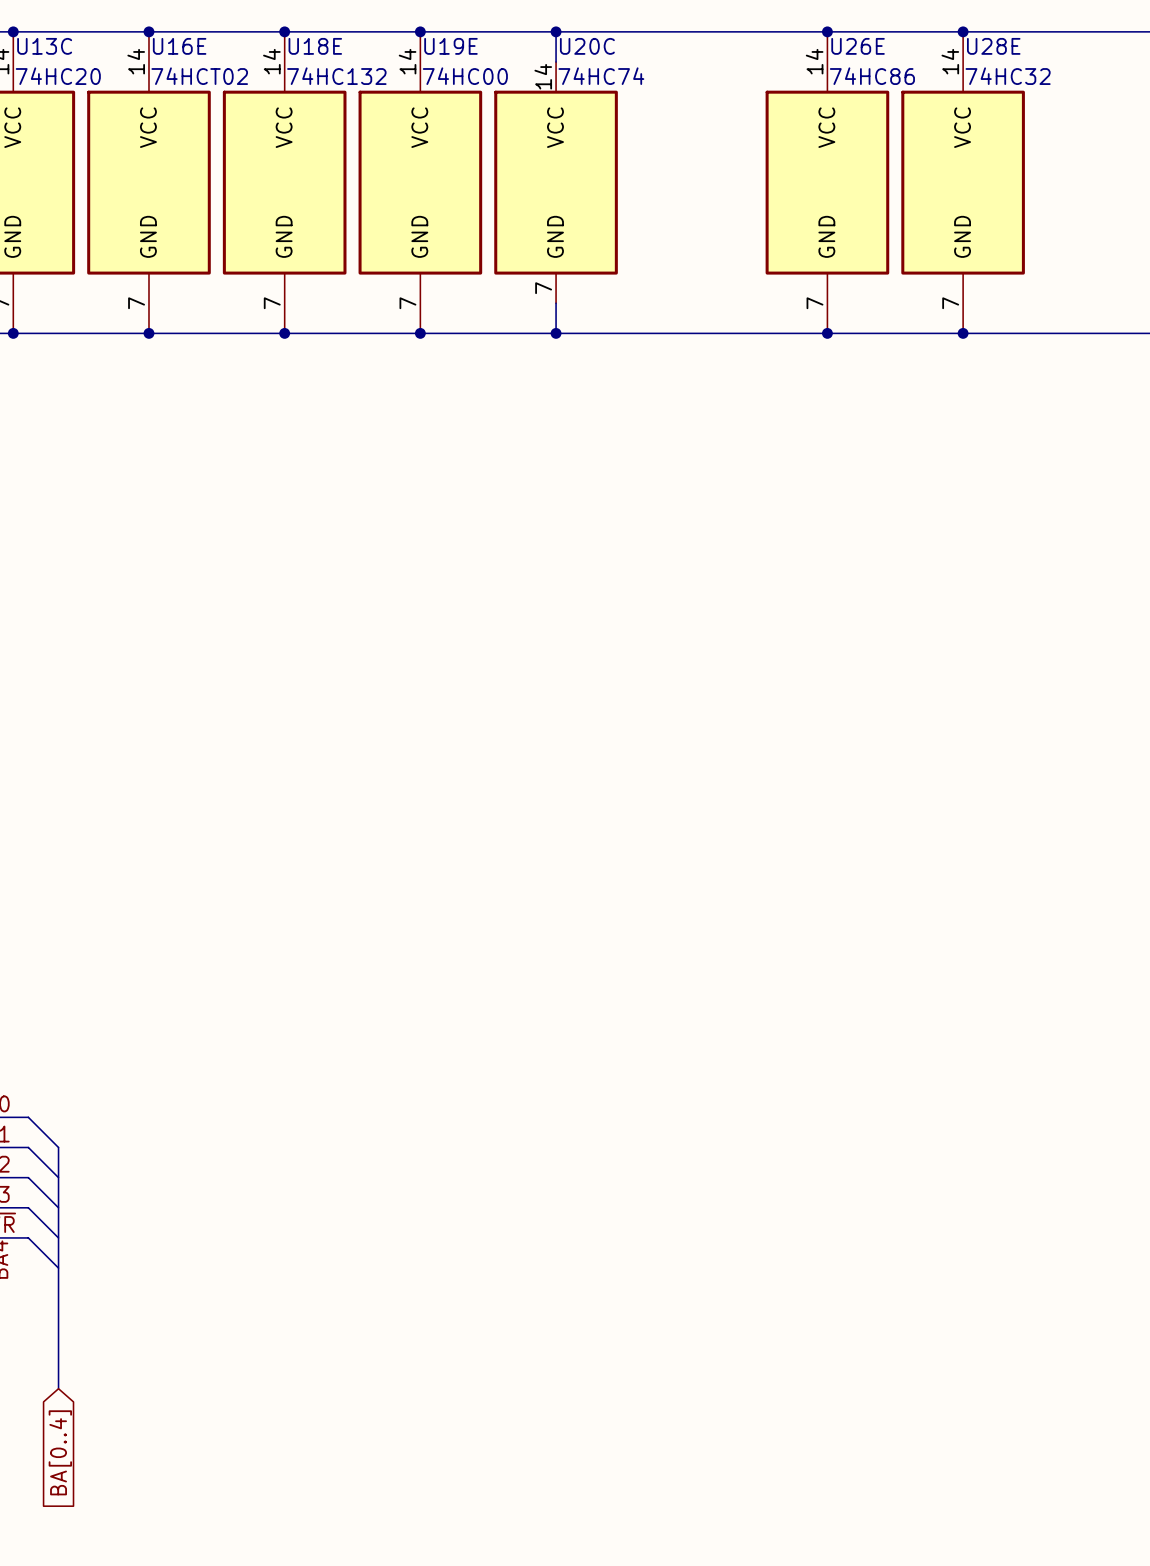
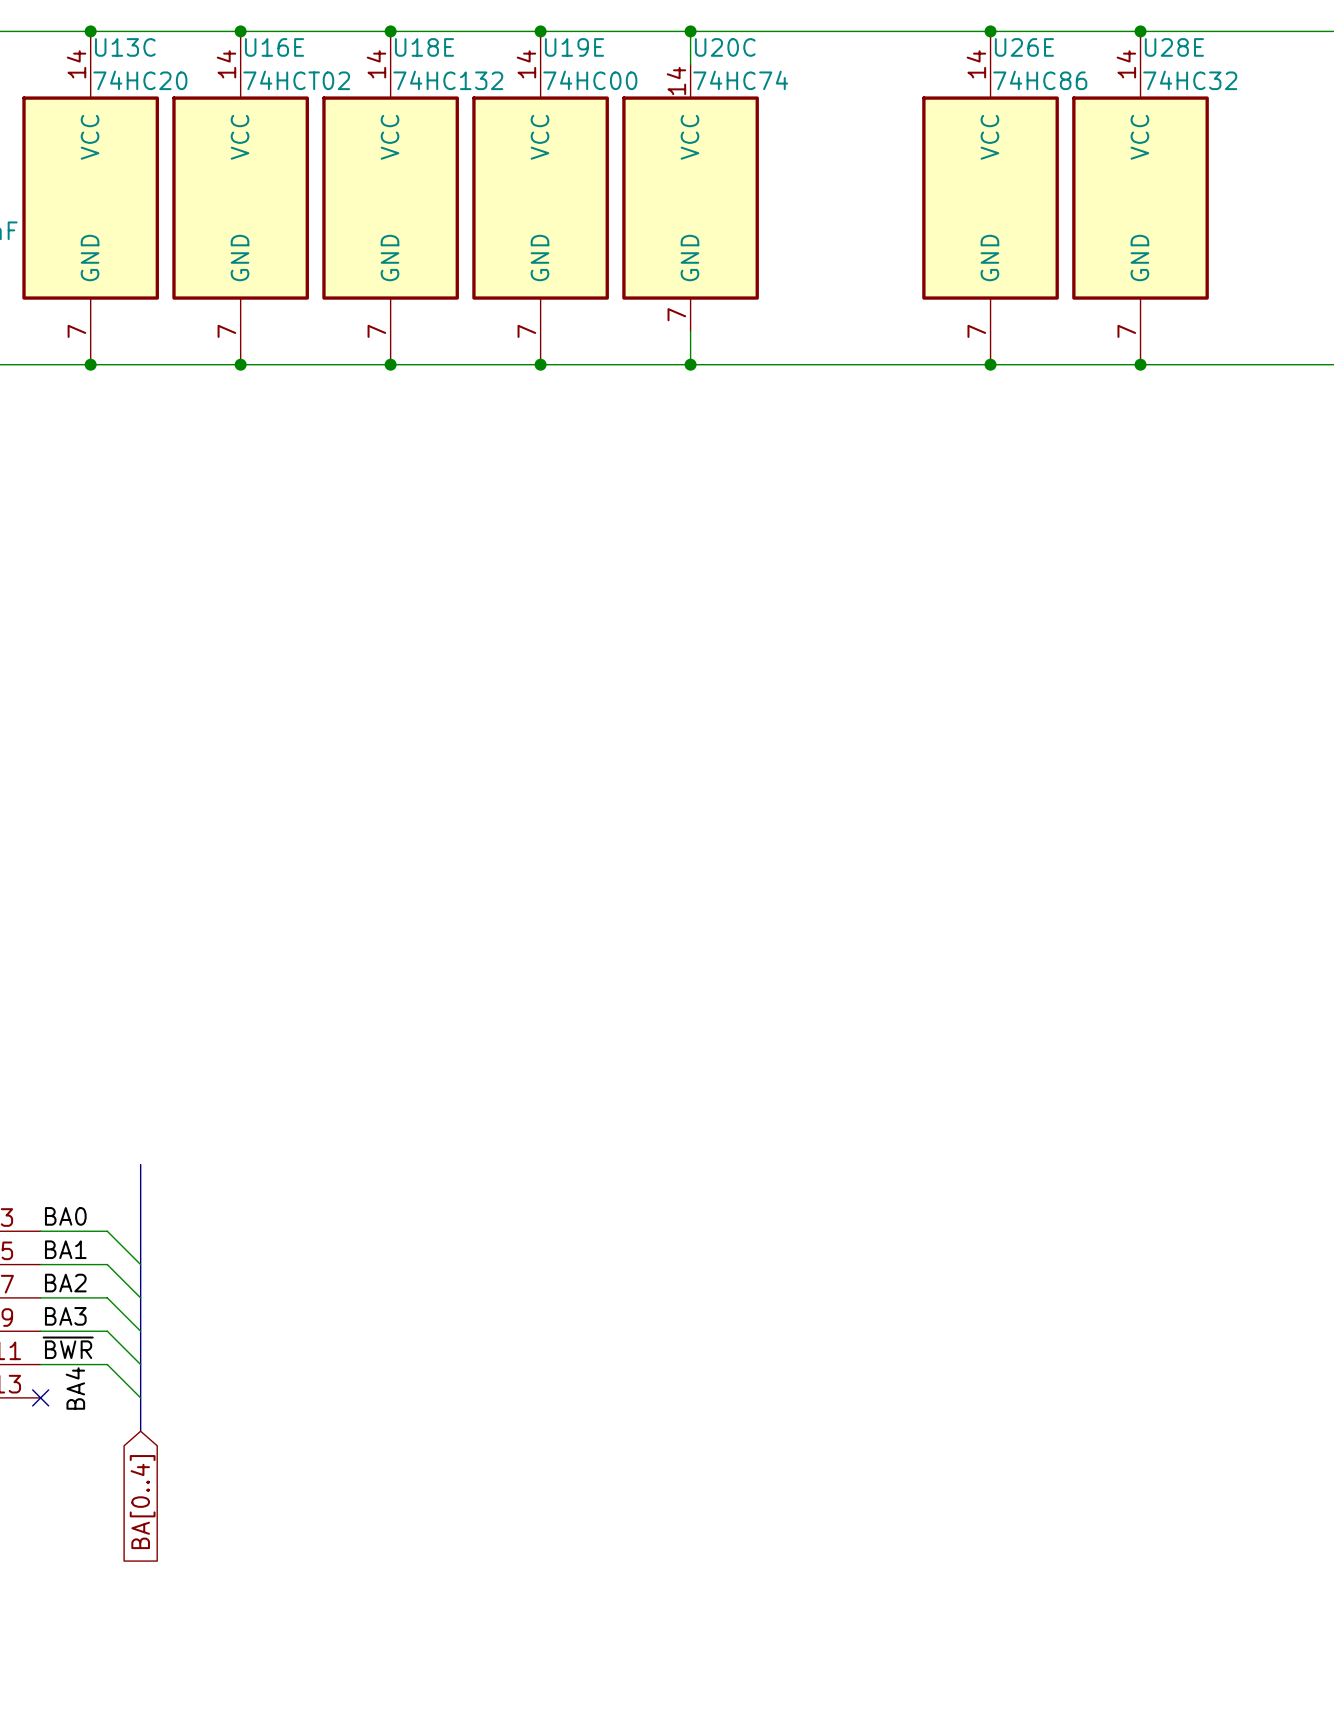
bus: (58, 1298) (58, 1388) -> (140, 1164) (140, 1264)
global label position: BA[0..4] (60, 1452) -> BA[0..4] (142, 1502)

